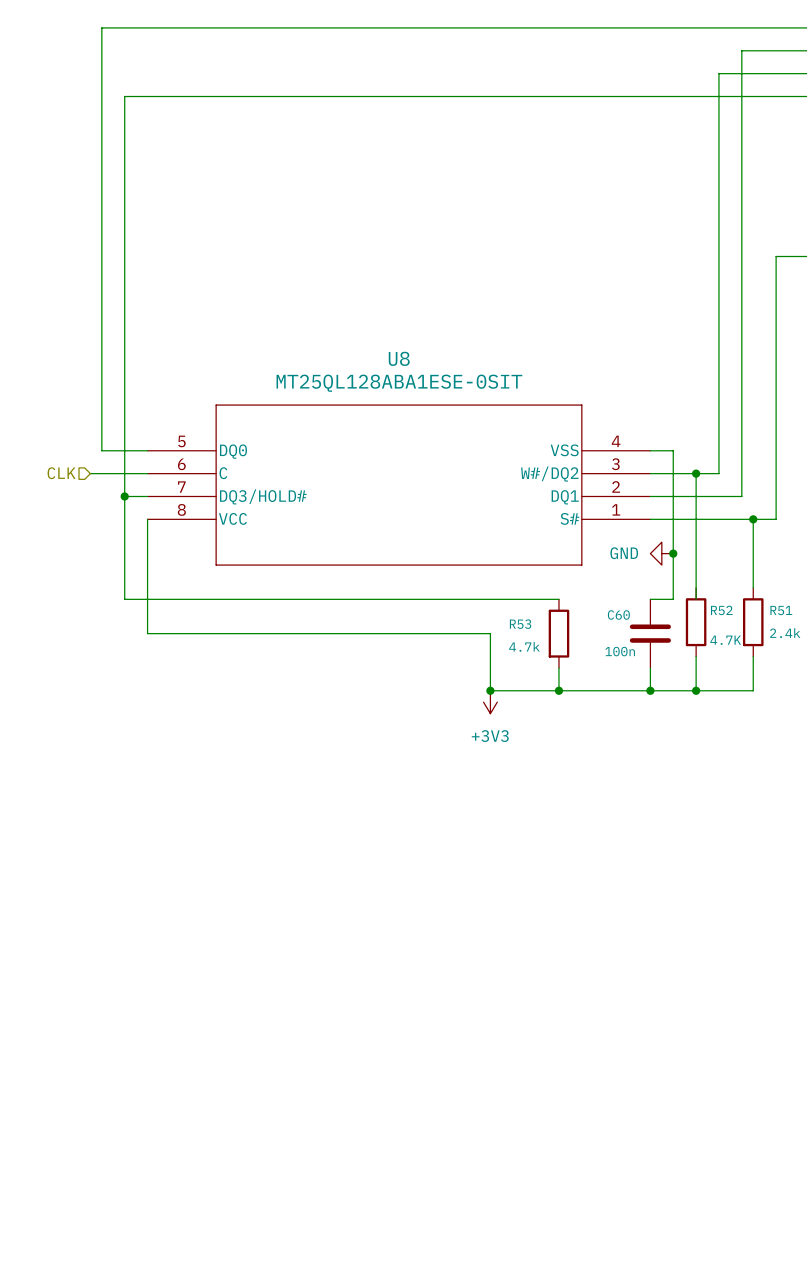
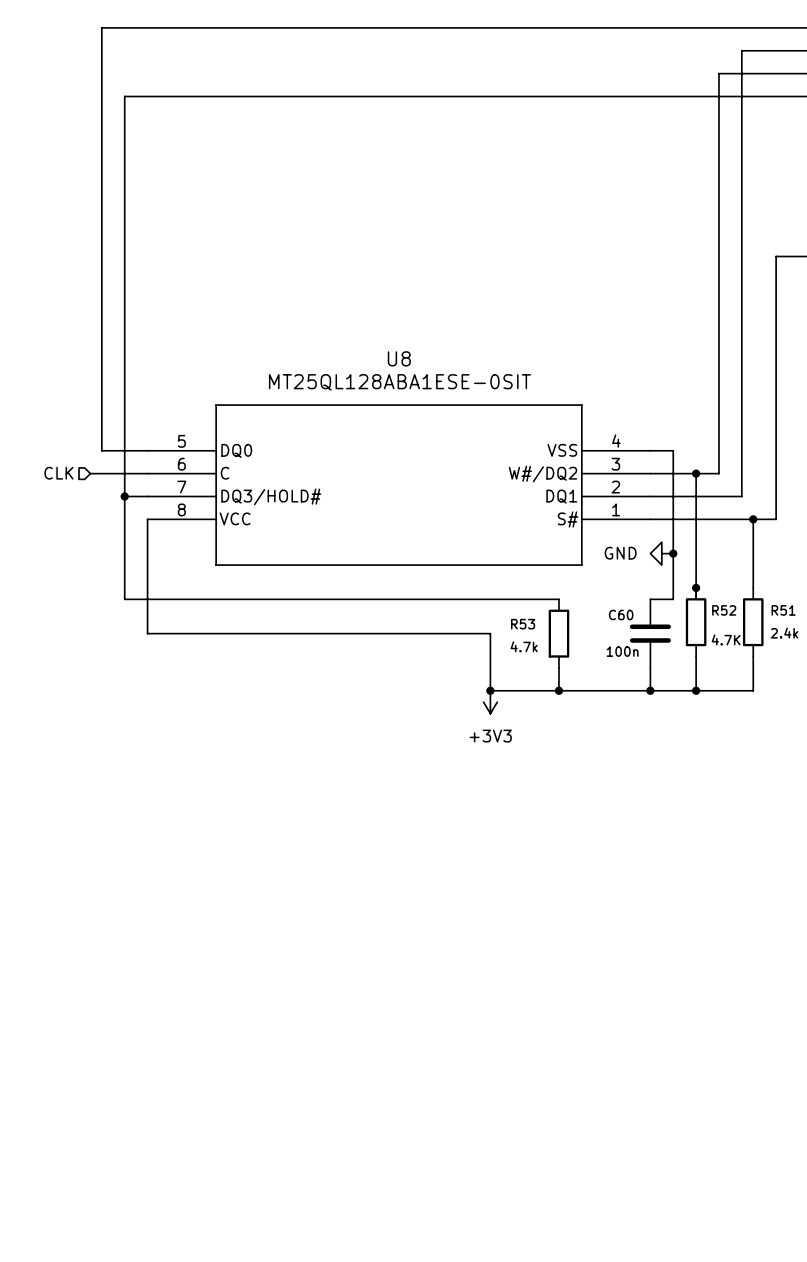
junction: none -> (696, 587)

